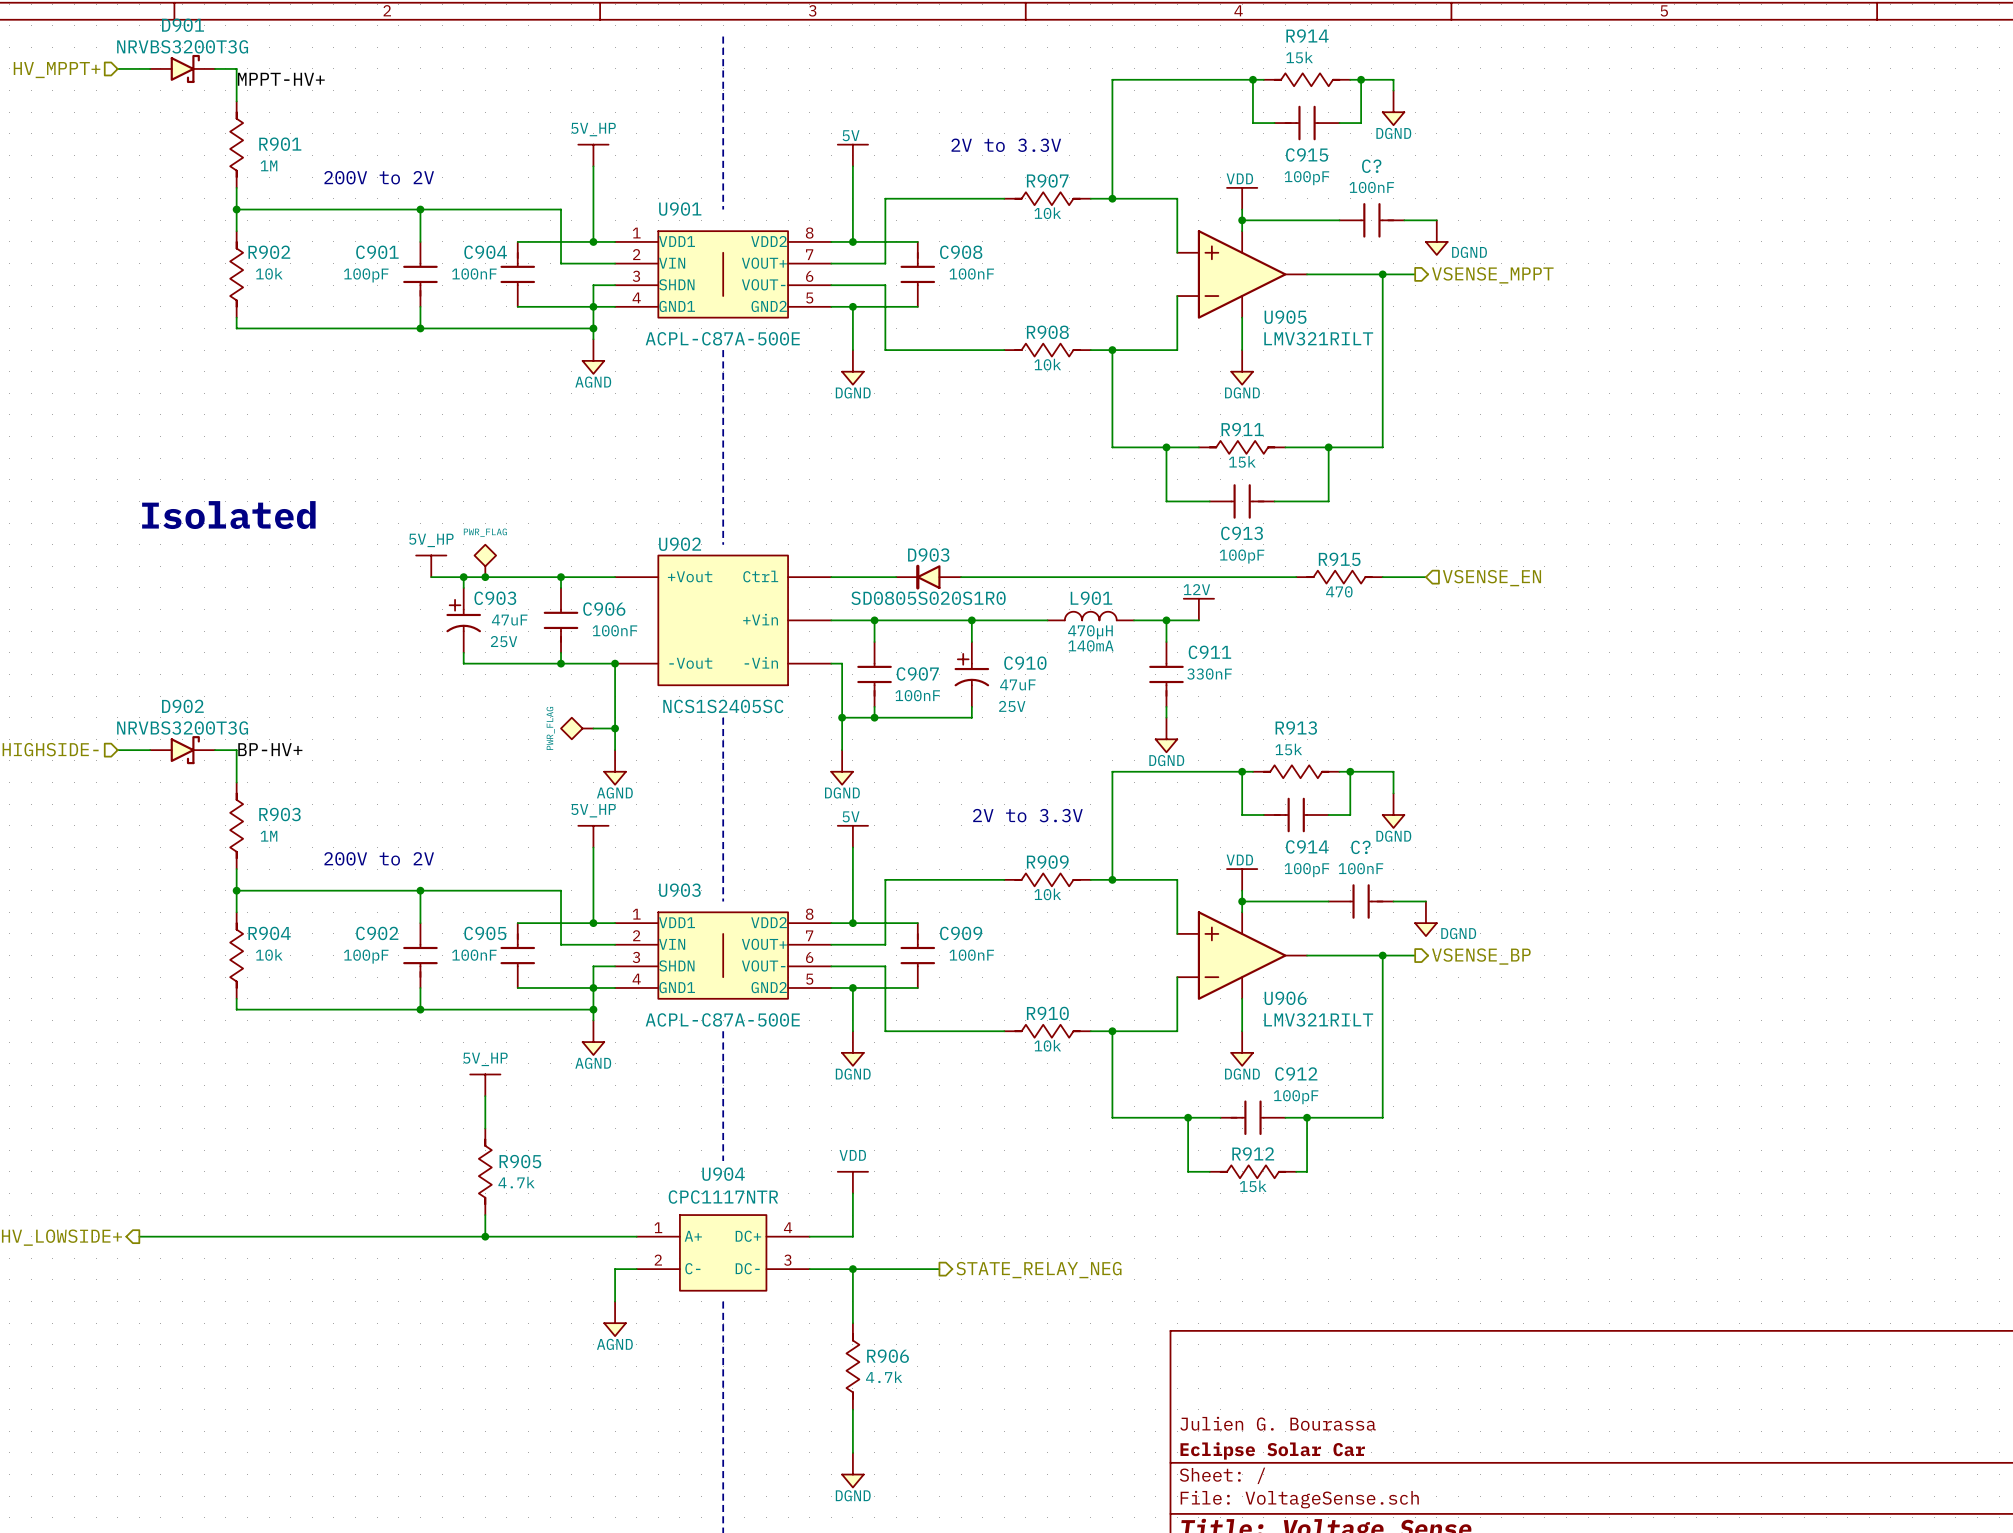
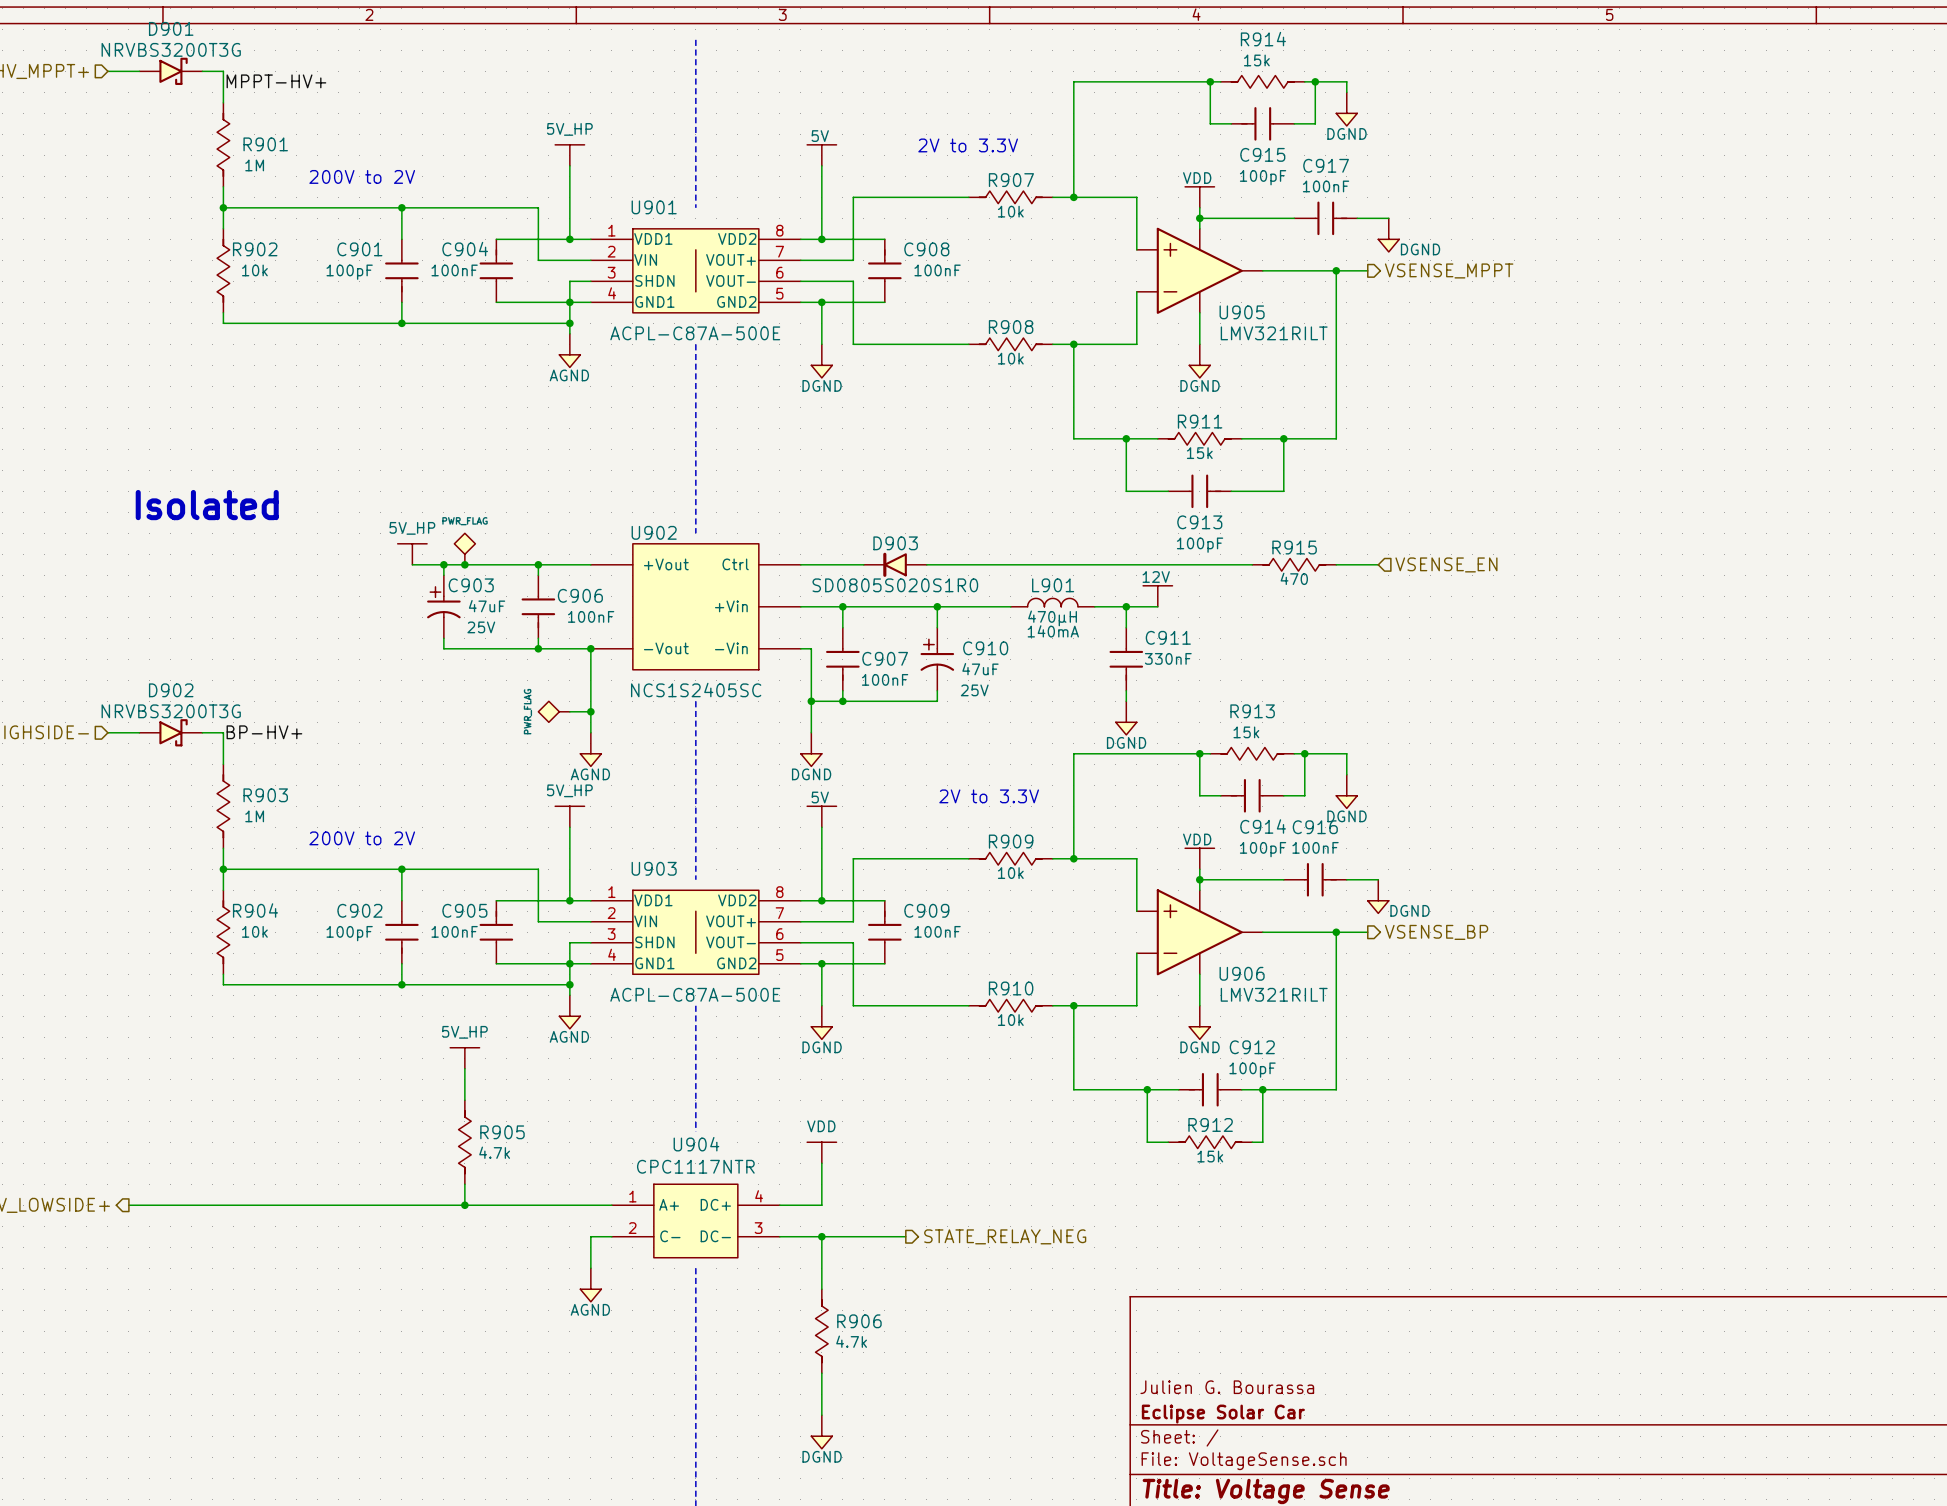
C? name: C? (1371, 166) -> C917 (1326, 165)
C? name: C? (1360, 847) -> C916 (1315, 827)

